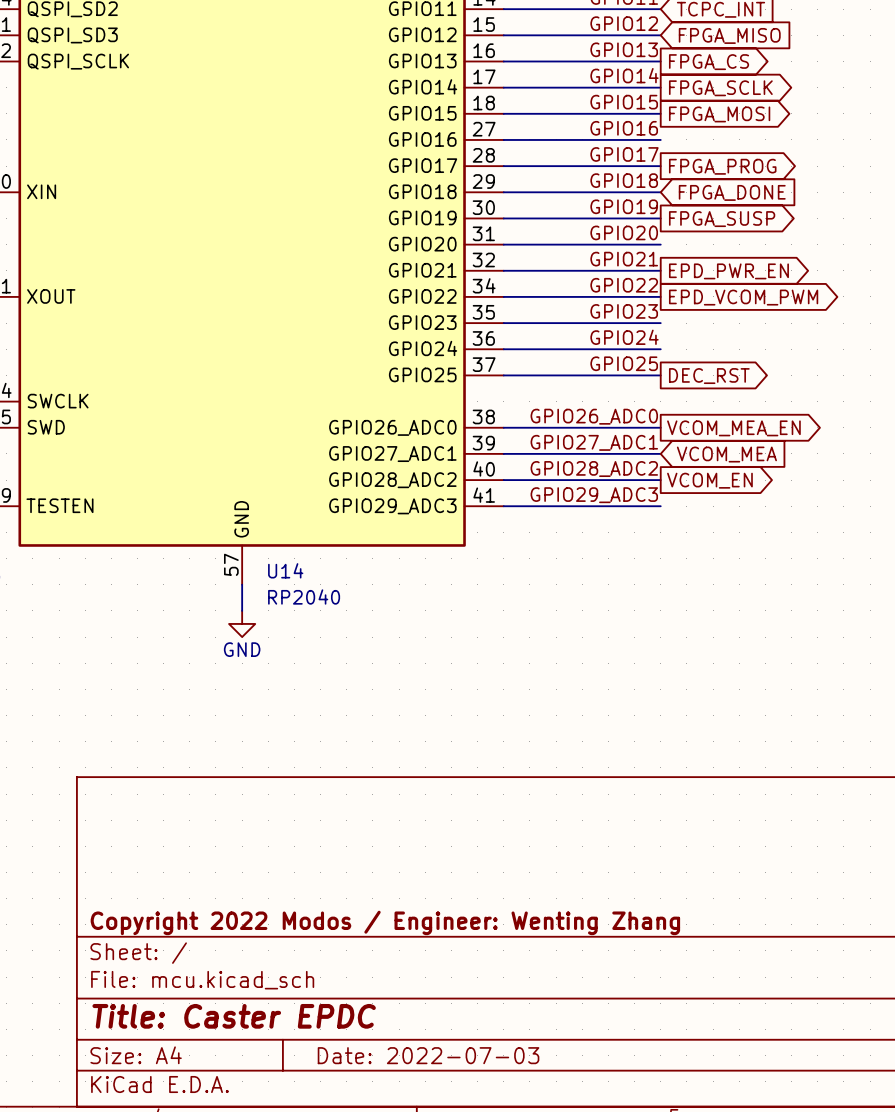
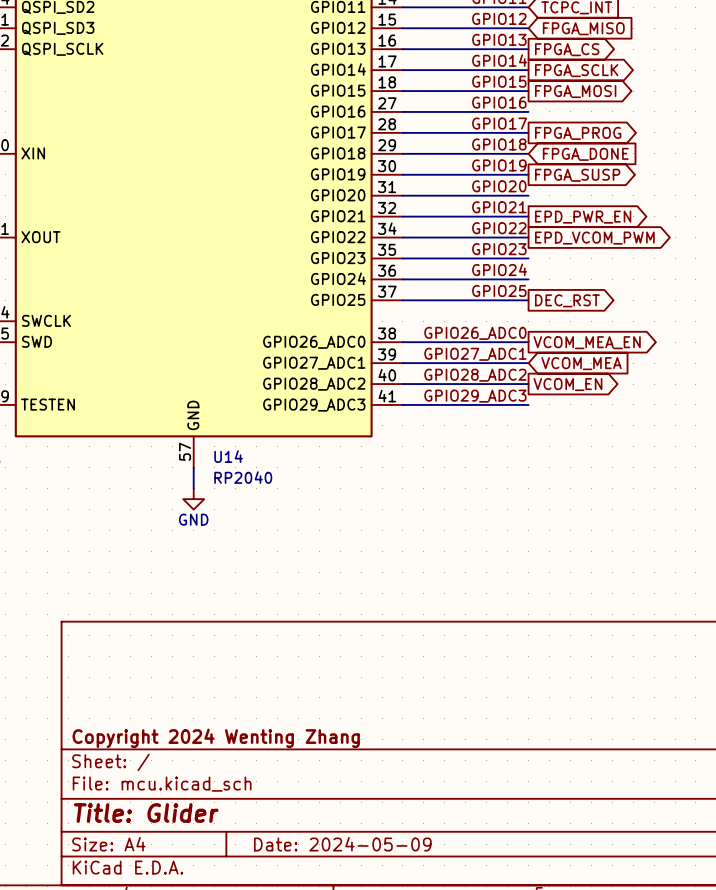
title block: Copyright 2022 Modos / Engineer: Wenting Zhang (385, 922) -> Copyright 2024 Wenting Zhang (216, 738)
title block: Title: Caster EPDC (234, 1016) -> Title: Glider (146, 813)
title block: Date: 2022-07-03 (428, 1055) -> Date: 2024-05-09 (342, 844)

